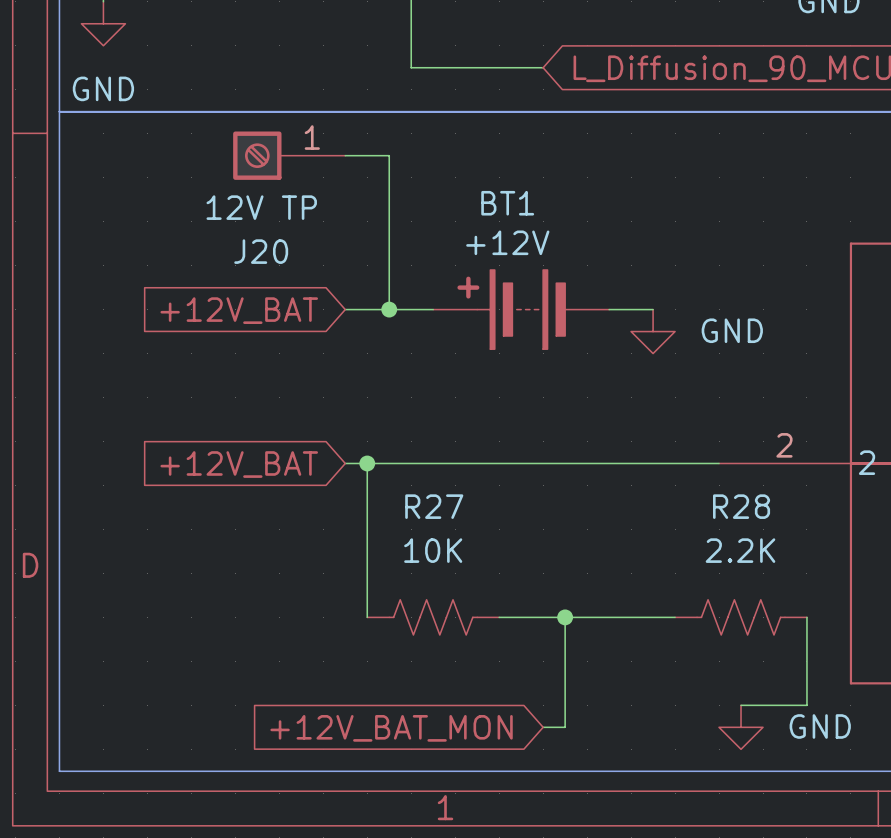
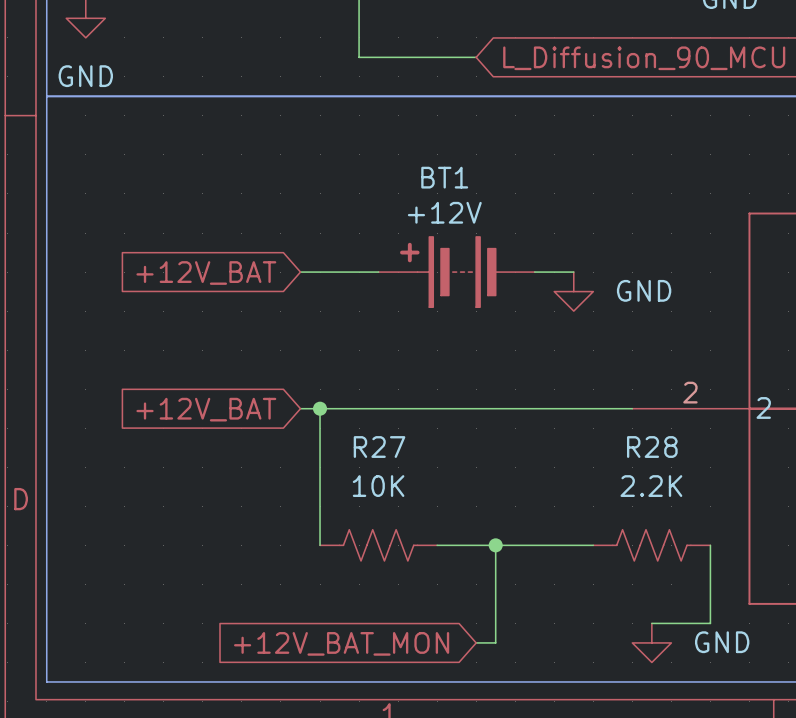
J20: 12V TP (289, 155) -> none
wire: (345, 155) (389, 155) (389, 309) -> none
junction: (389, 309) -> none

